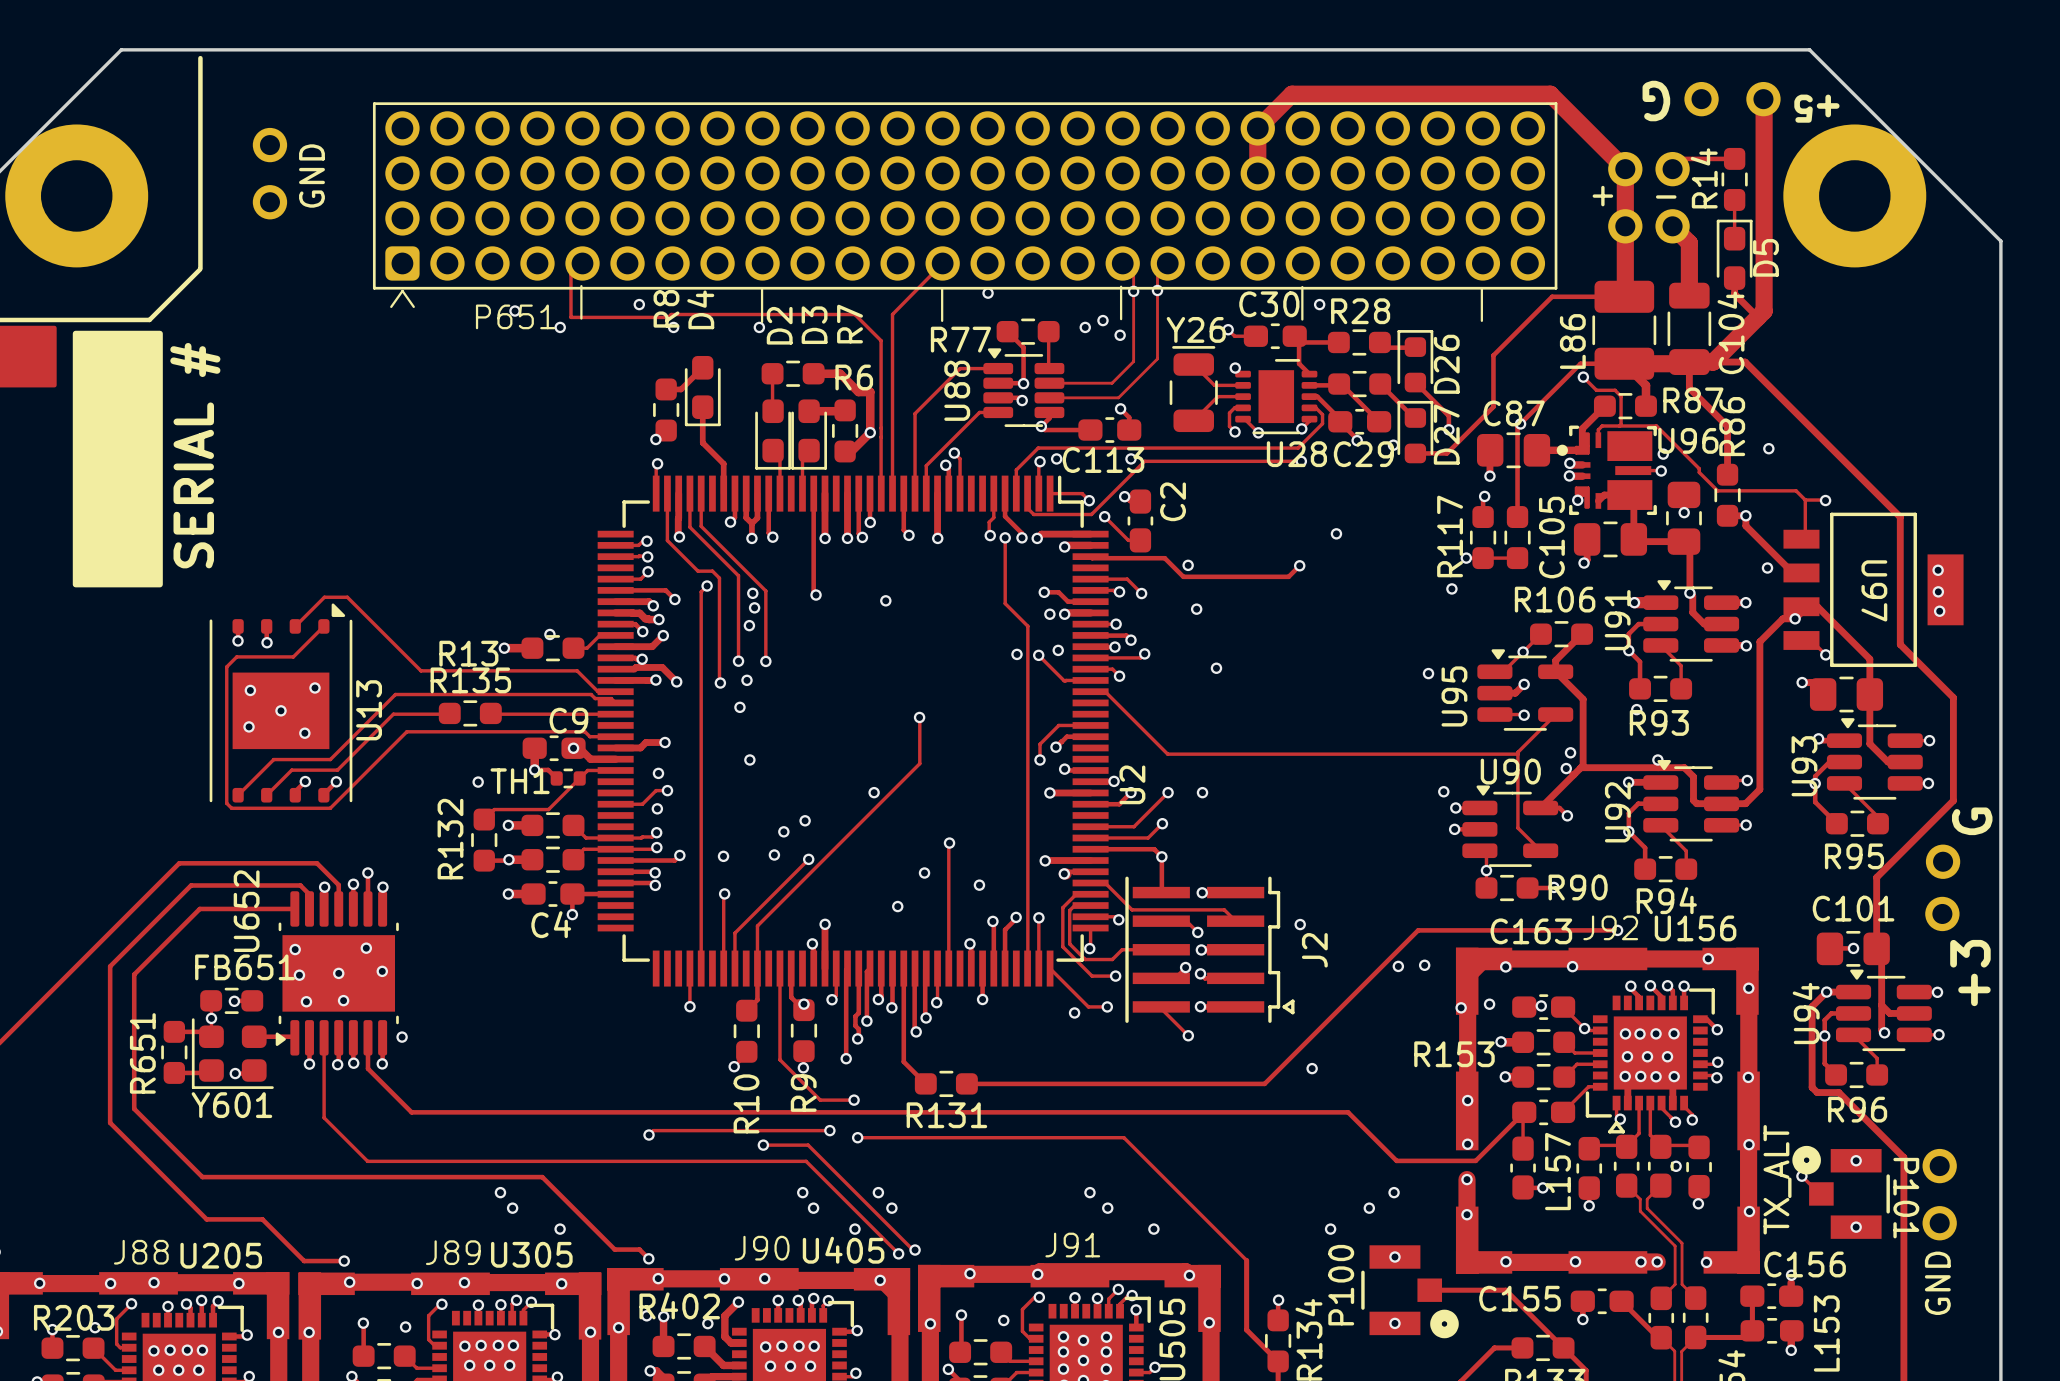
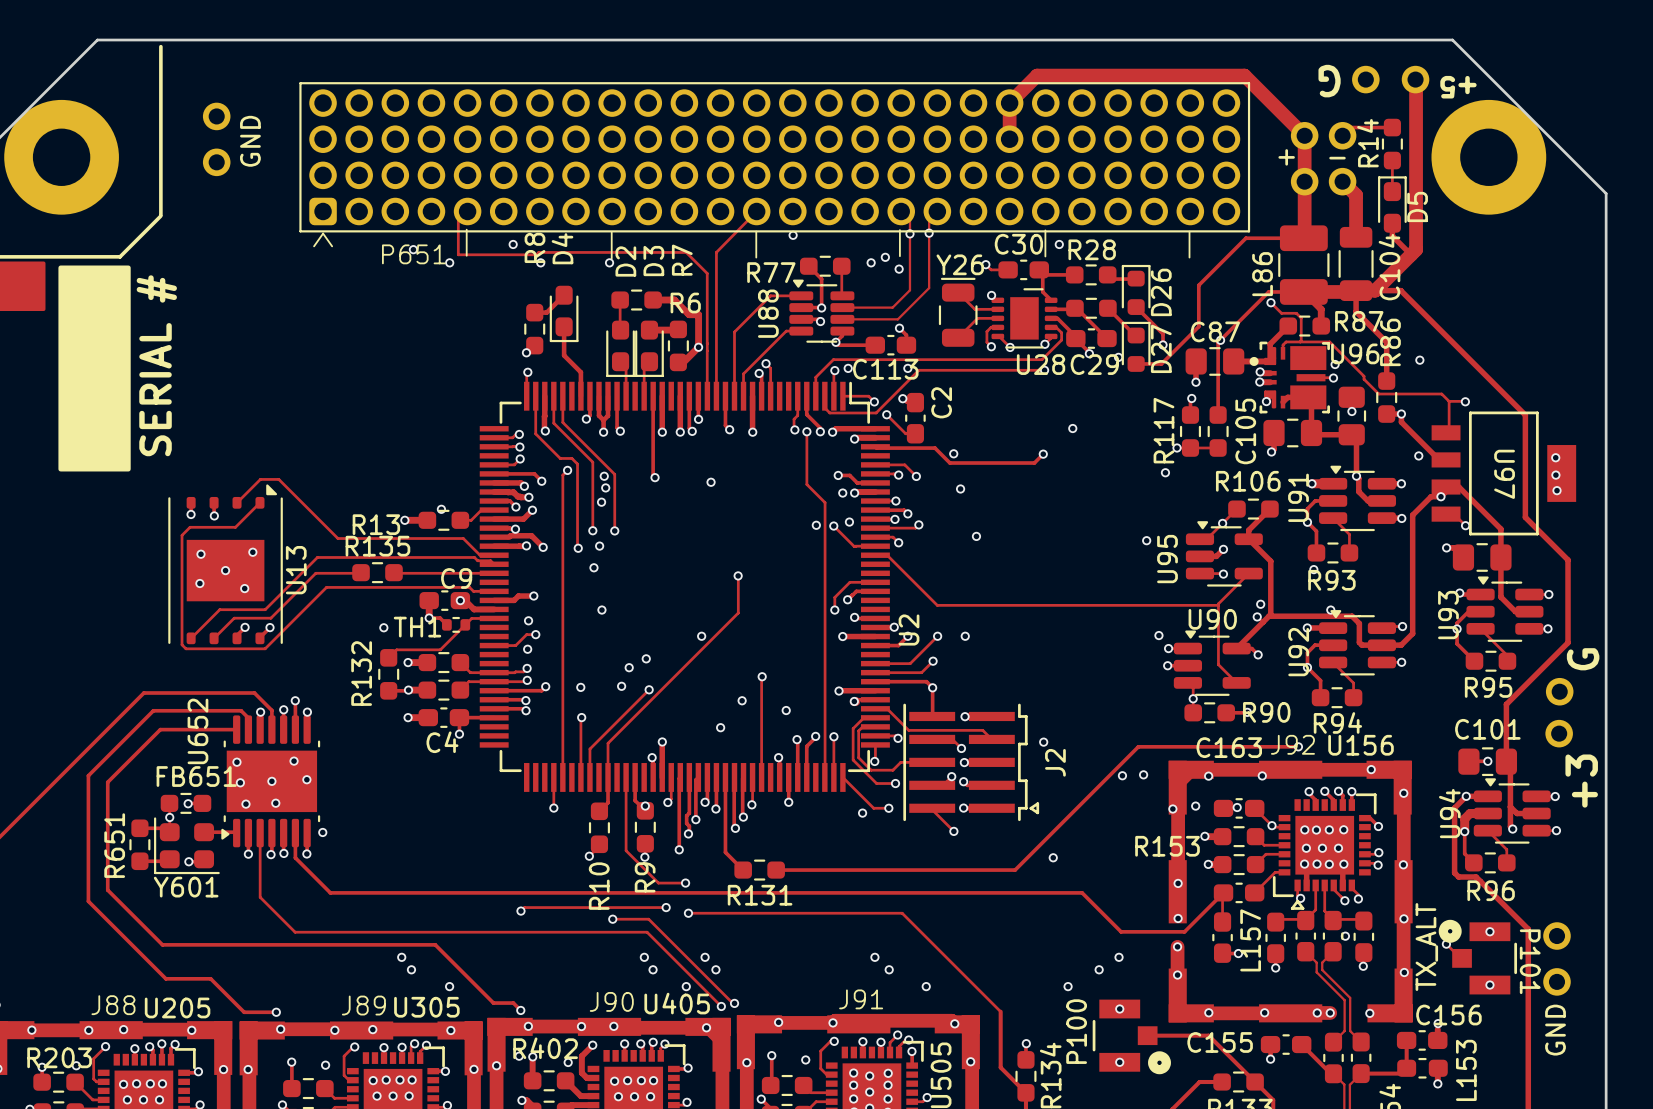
track width: thin (1853, 1013) (1831, 1013) (1824, 1020) (1824, 1035) -> thick (1487, 813) (1470, 813) (1464, 818) (1464, 831)

